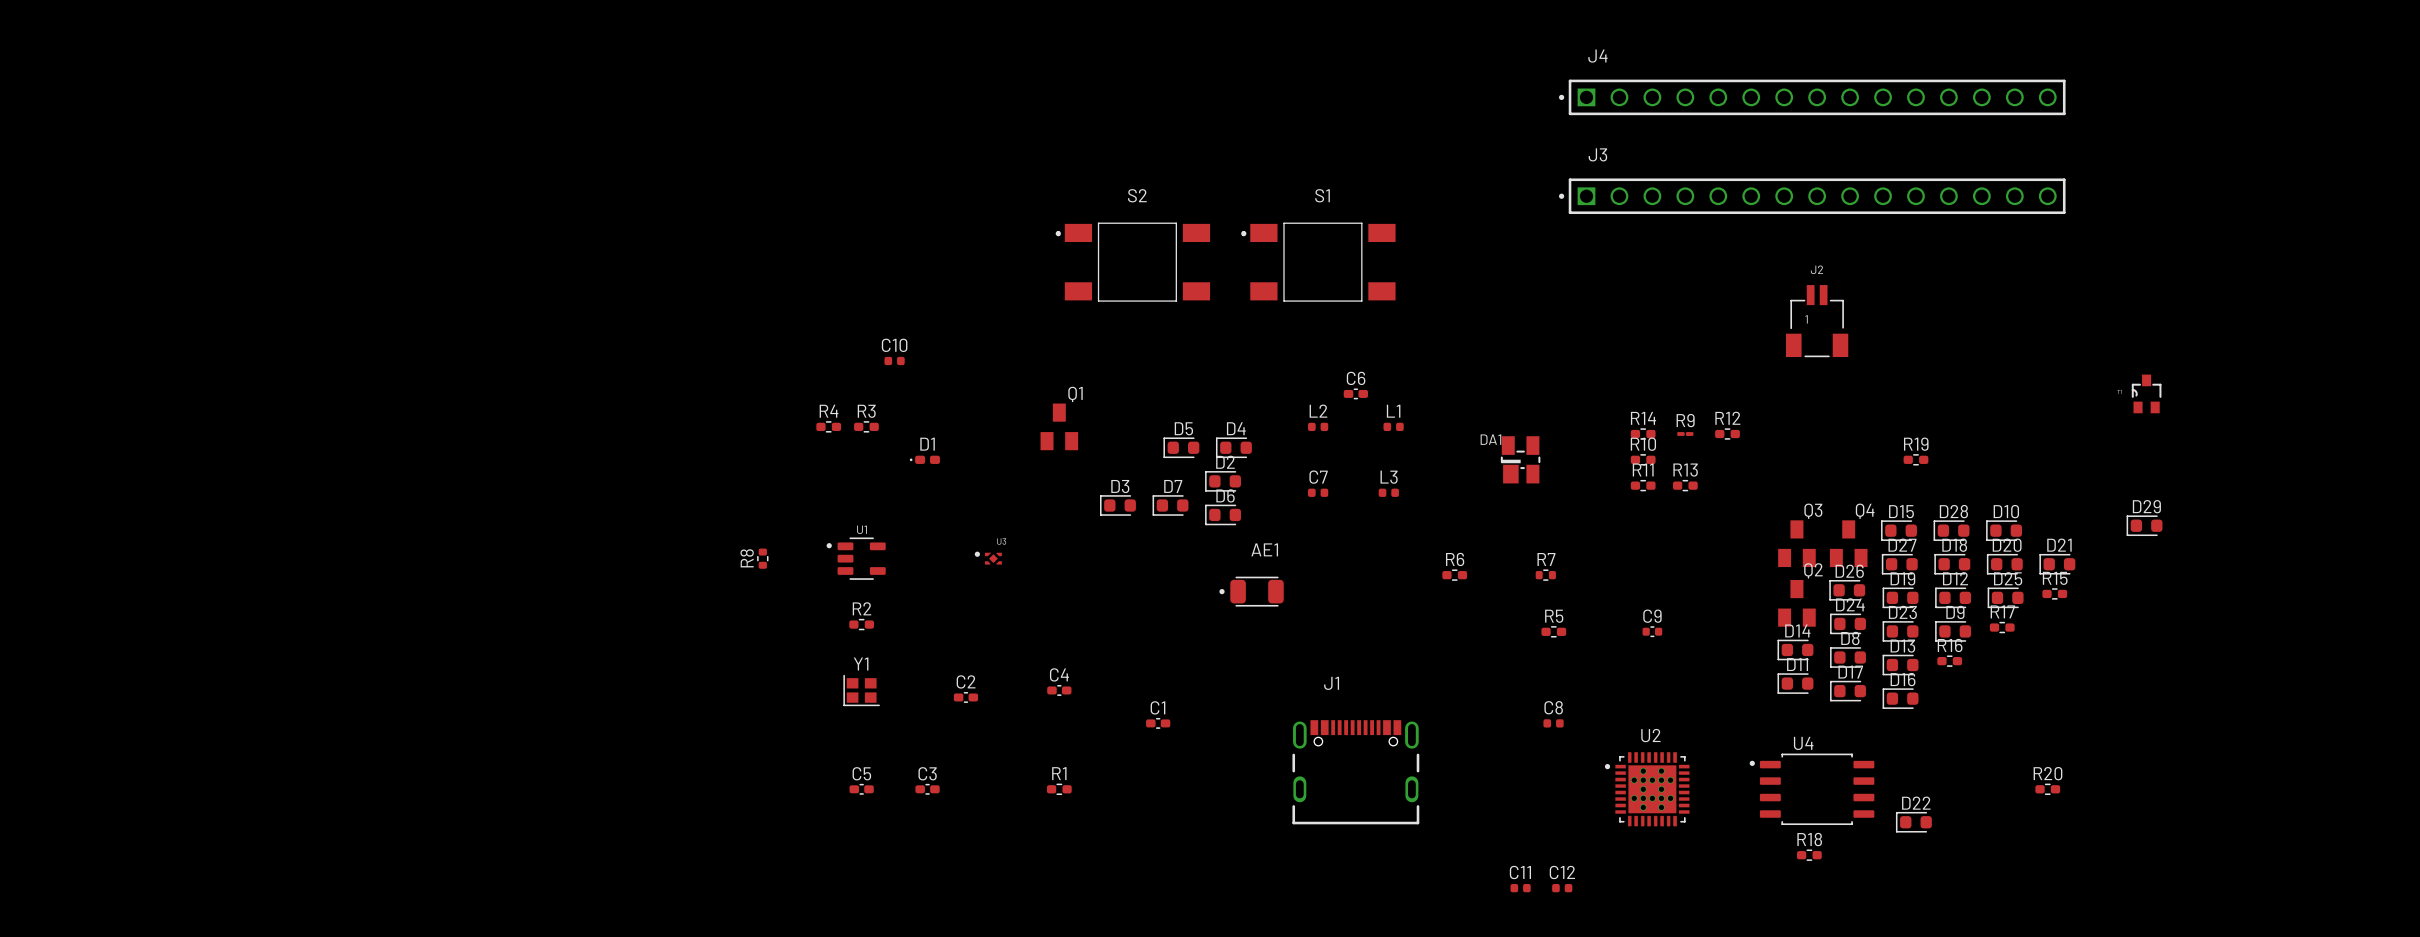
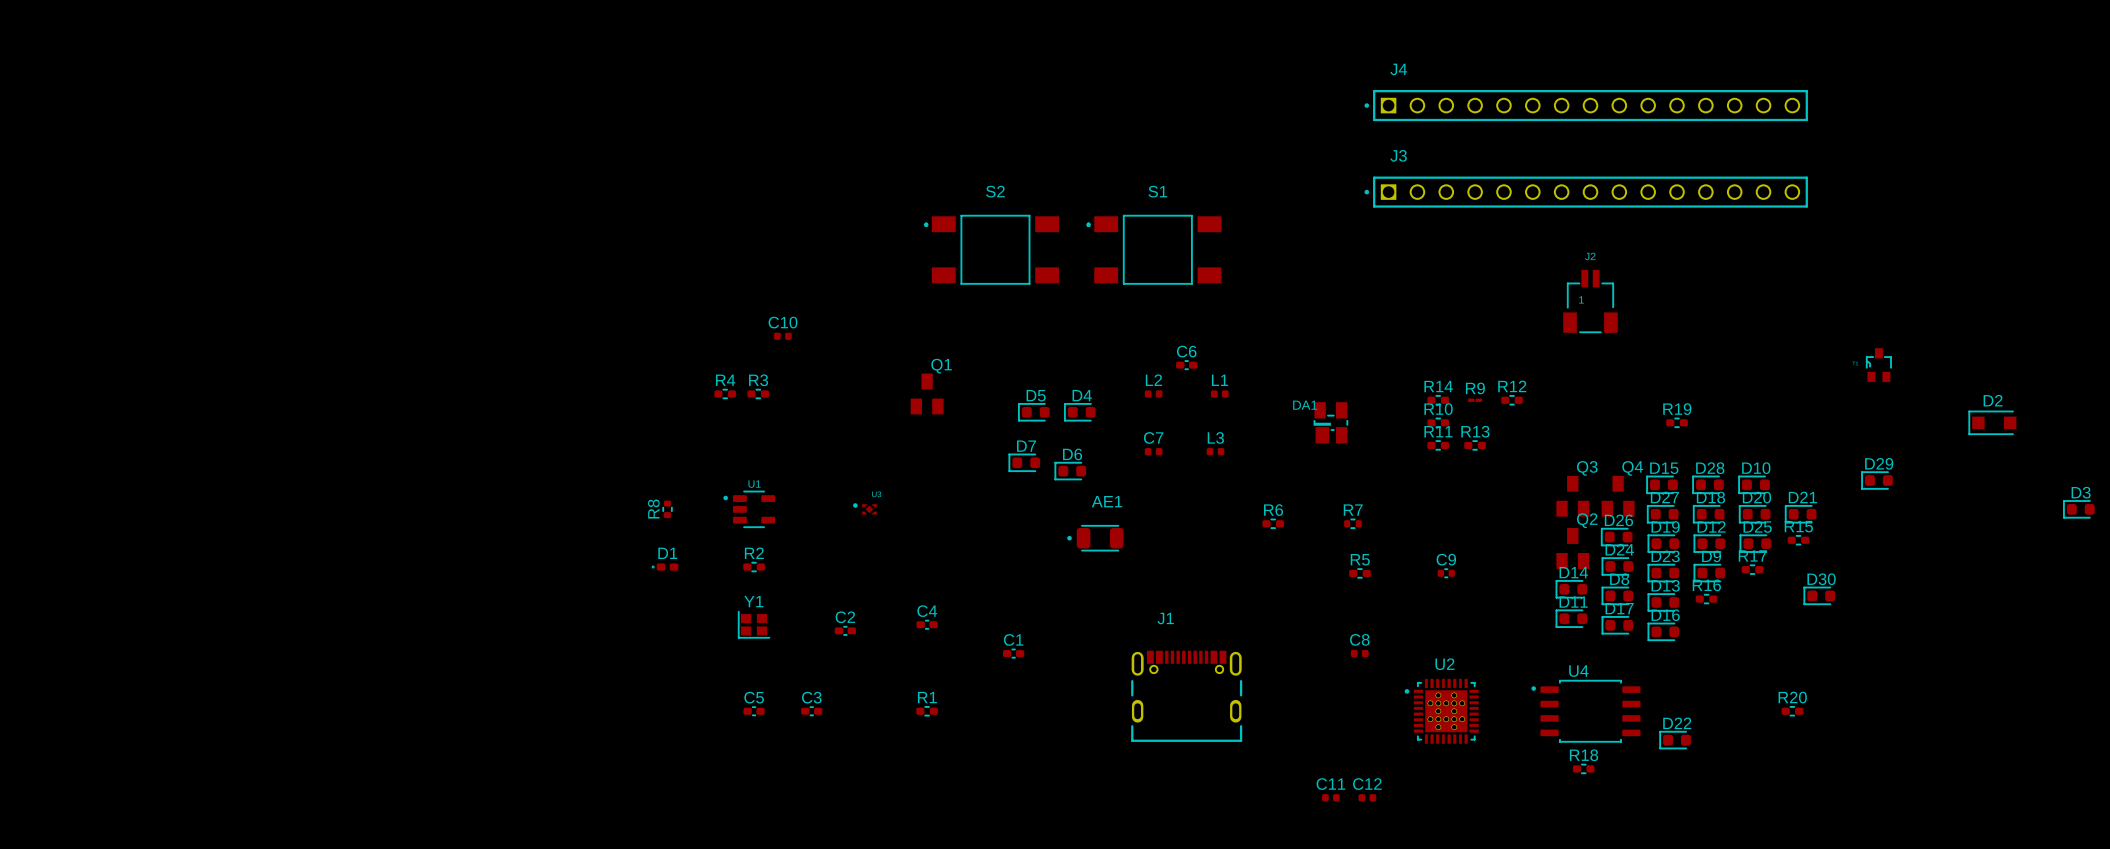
D1 position: (924, 459) -> (665, 567)
D2 footprint: [1205, 471, 1242, 492] -> [1968, 410, 2017, 435]
D3 position: (1117, 505) -> (2078, 509)
D30: none -> (1819, 595)

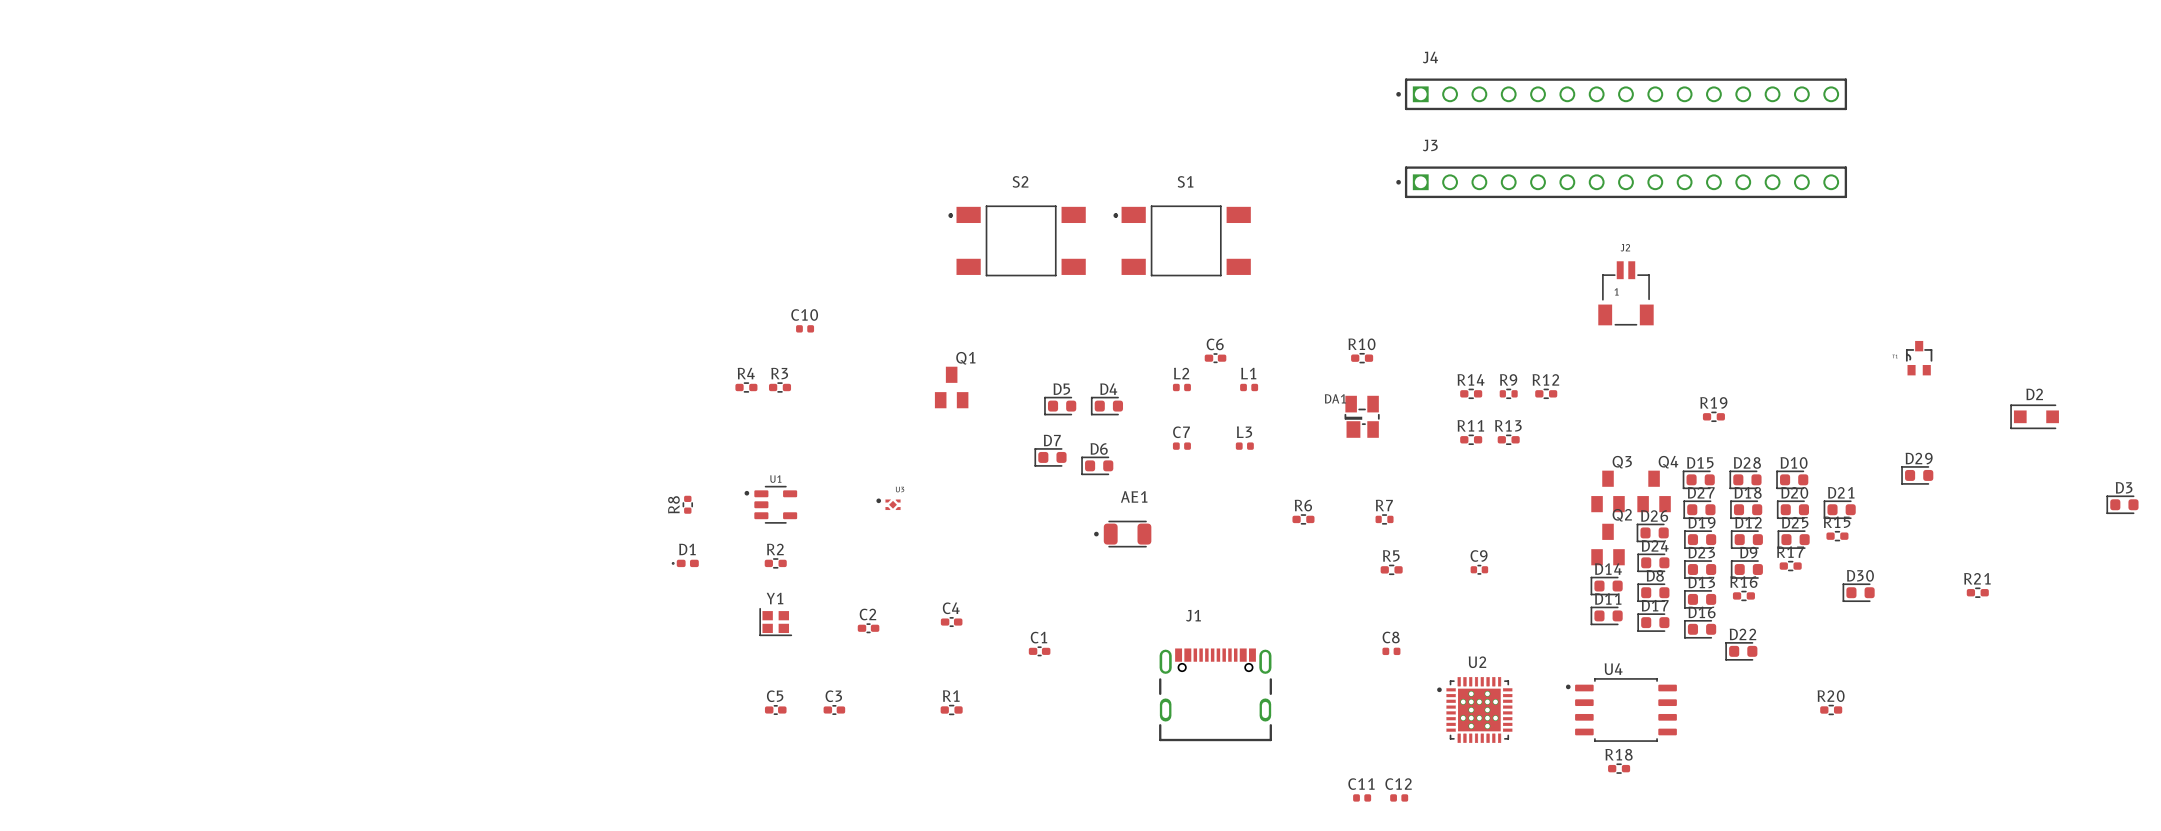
R9 footprint: [1468, 398, 1483, 402] -> [1499, 388, 1518, 399]
R10 position: (1438, 422) -> (1362, 358)
R21: none -> (1977, 592)
D22 position: (1675, 740) -> (1741, 651)

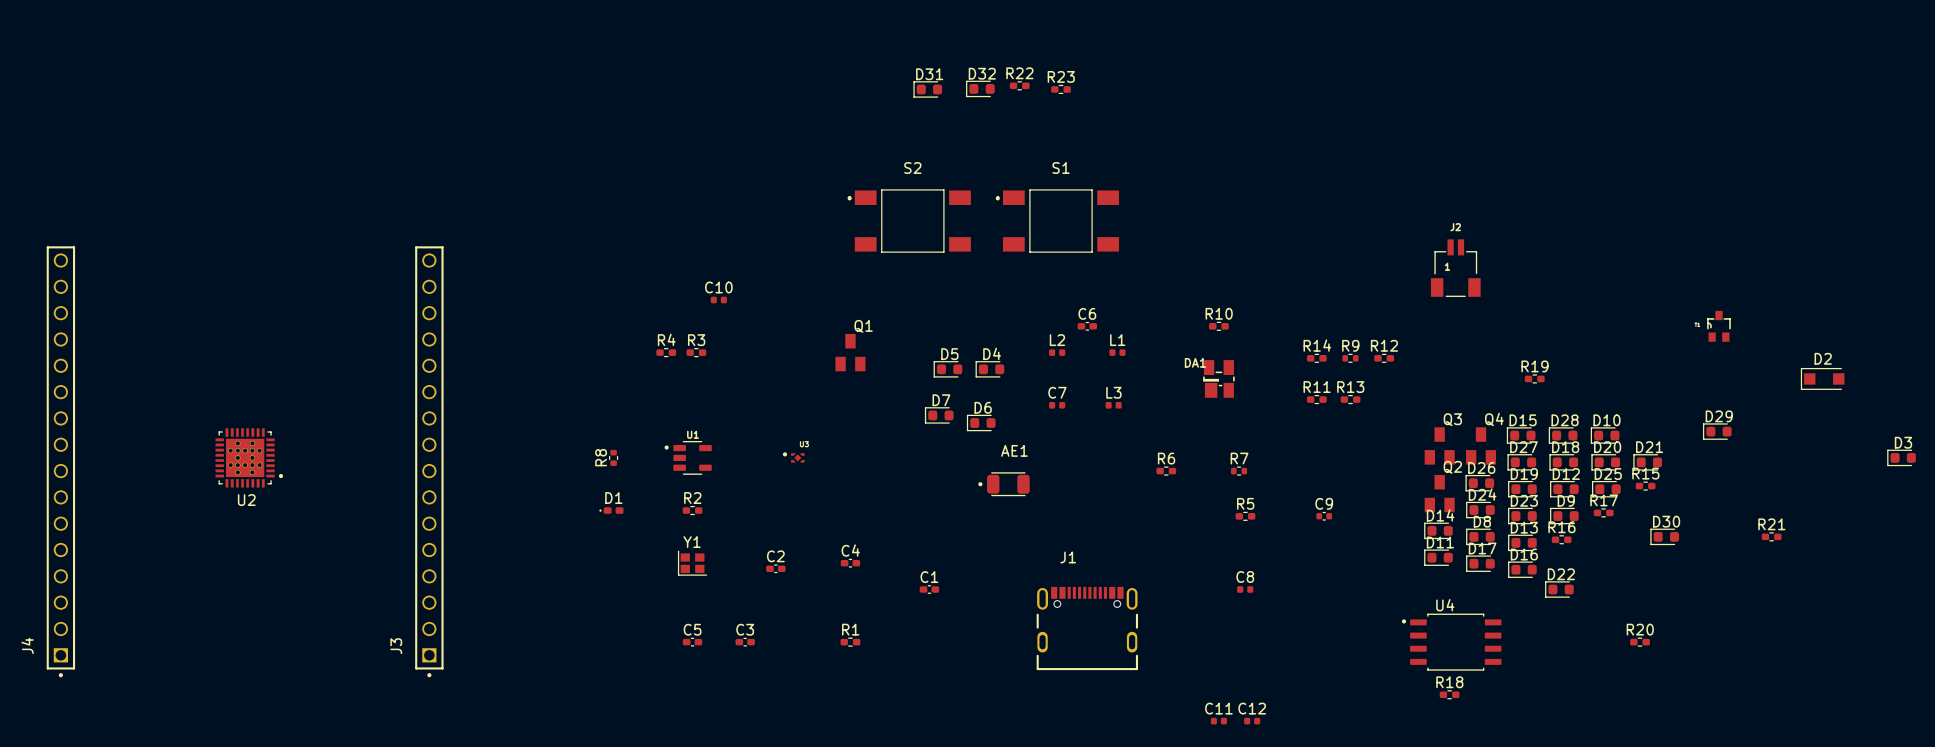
J4 name position: J4 (1430, 57) -> J4 (27, 645)
J4 footprint: [1396, 78, 1848, 111] -> [46, 246, 76, 678]
R22: none -> (1019, 85)
D32: none -> (980, 88)
D31: none -> (927, 89)
R23: none -> (1061, 89)
J3 name position: J3 (1430, 145) -> J3 (396, 646)
J3 footprint: [1396, 166, 1848, 199] -> [415, 246, 444, 678]
U2 rotation: 0° (1474, 709) -> 180° (249, 457)
U2 position: (1474, 709) -> (249, 457)

